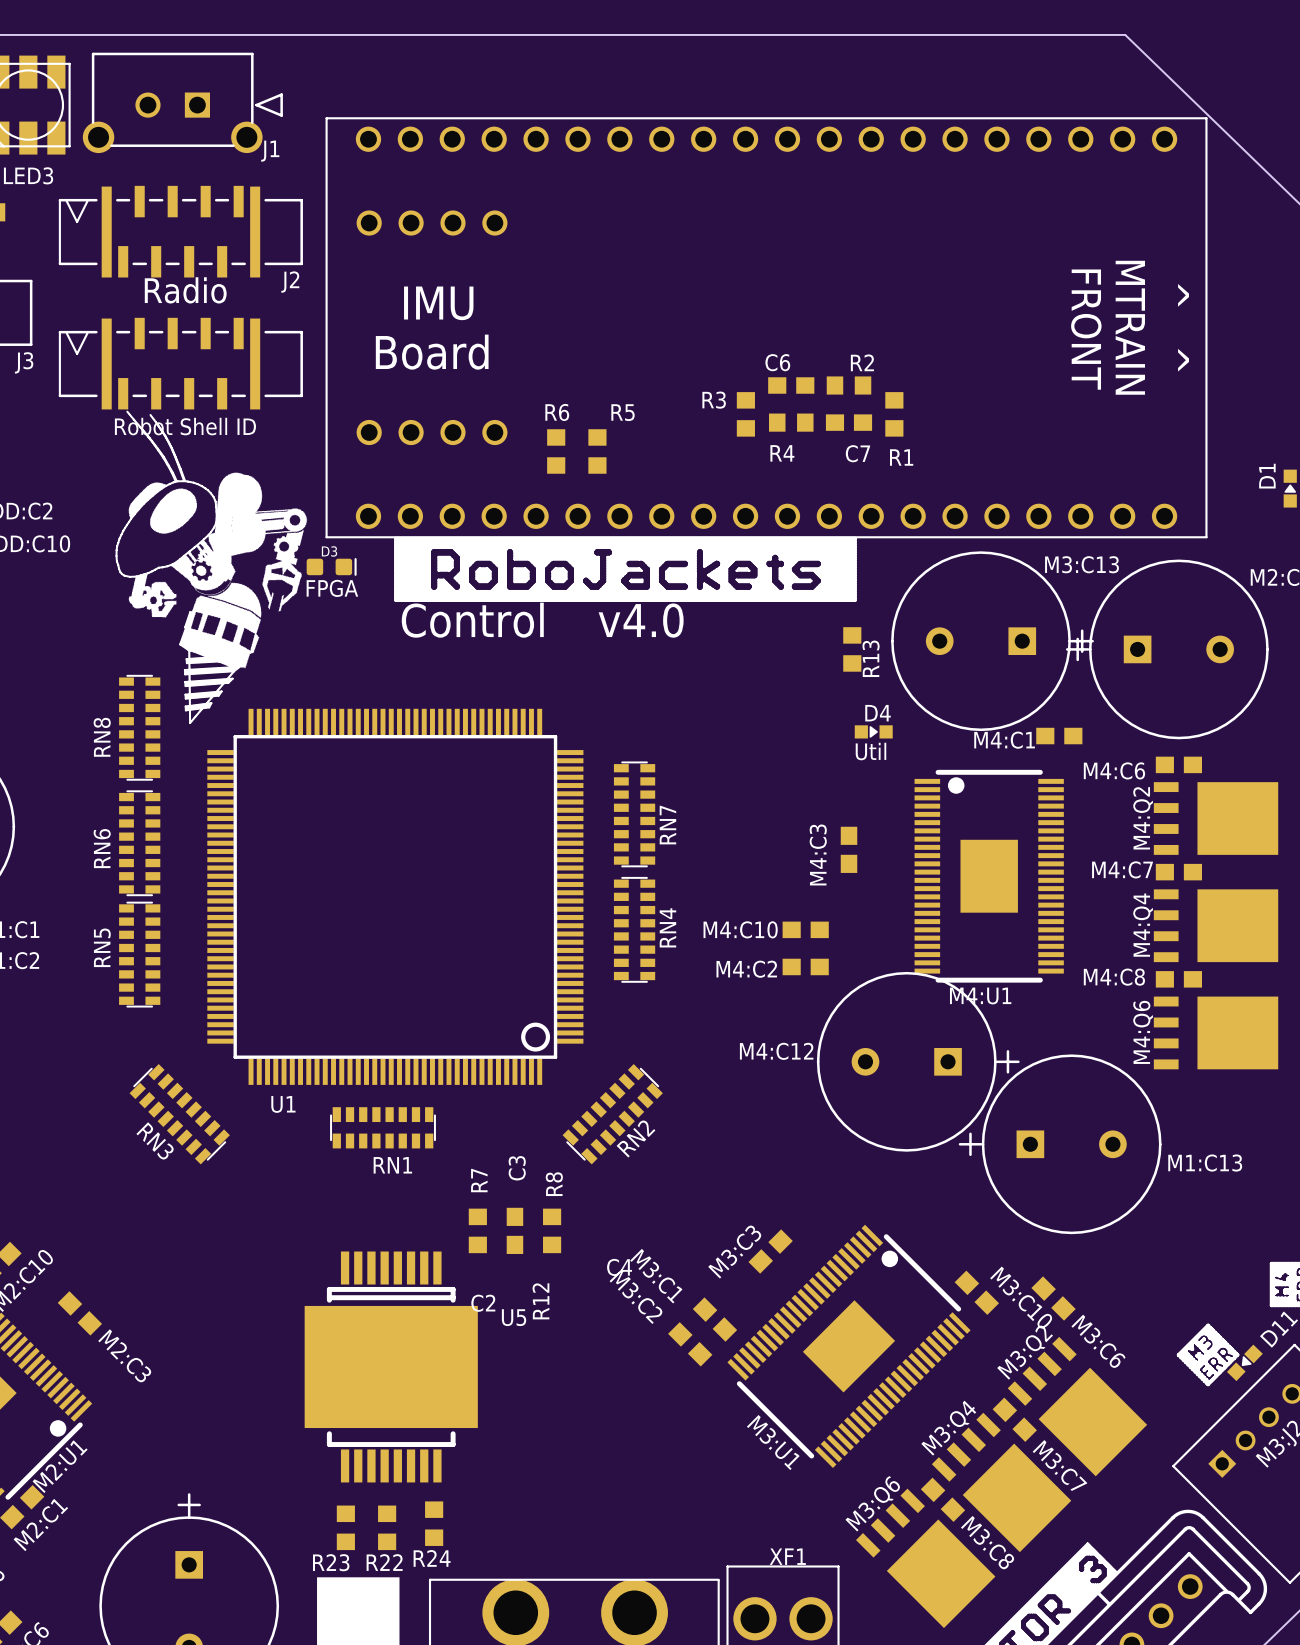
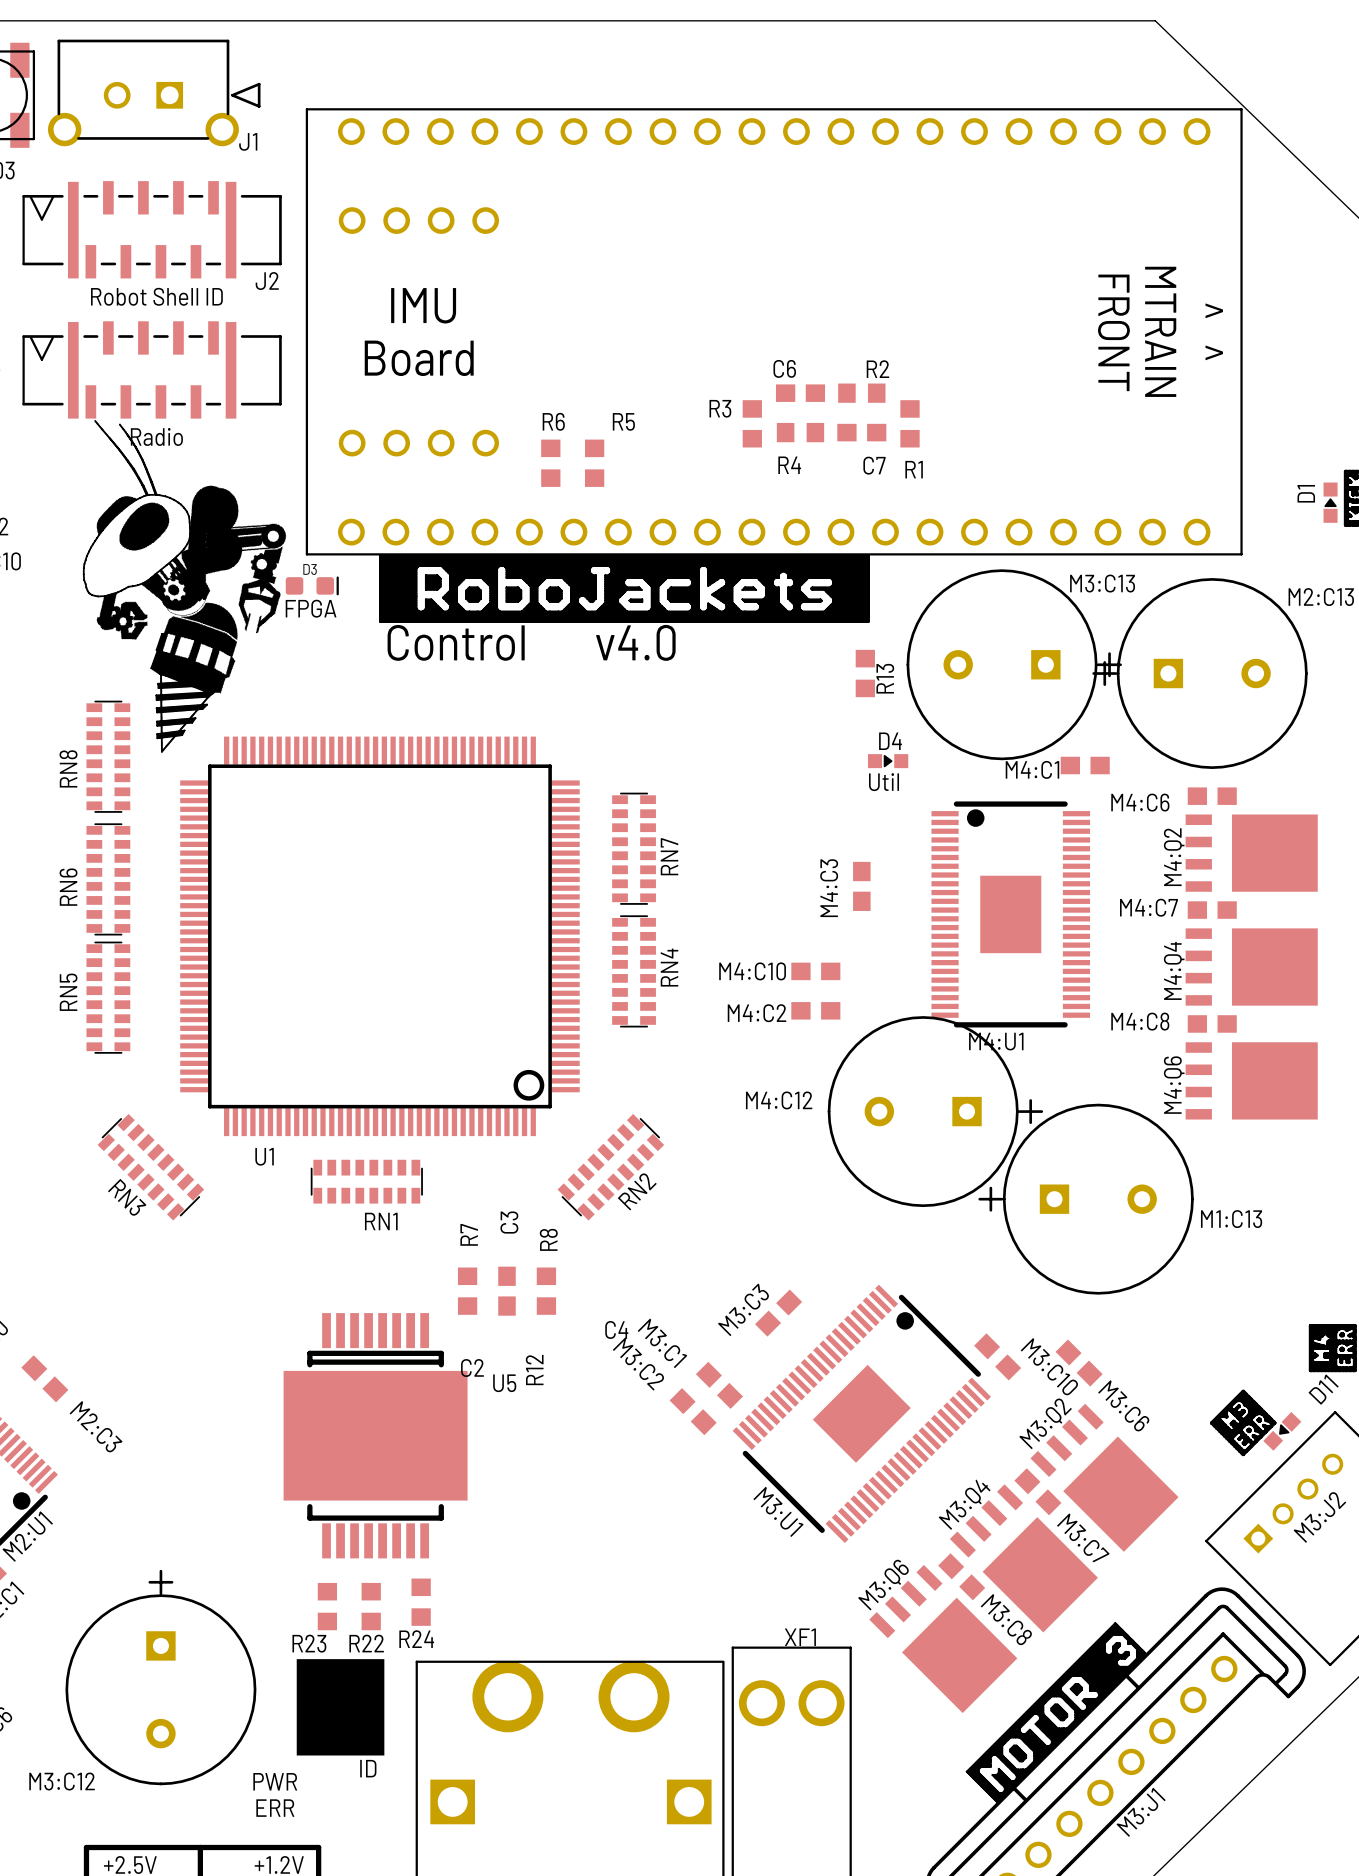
text: Radio (185, 290) -> Robot Shell ID (156, 296)
text: Robot Shell ID (185, 426) -> Radio (156, 436)

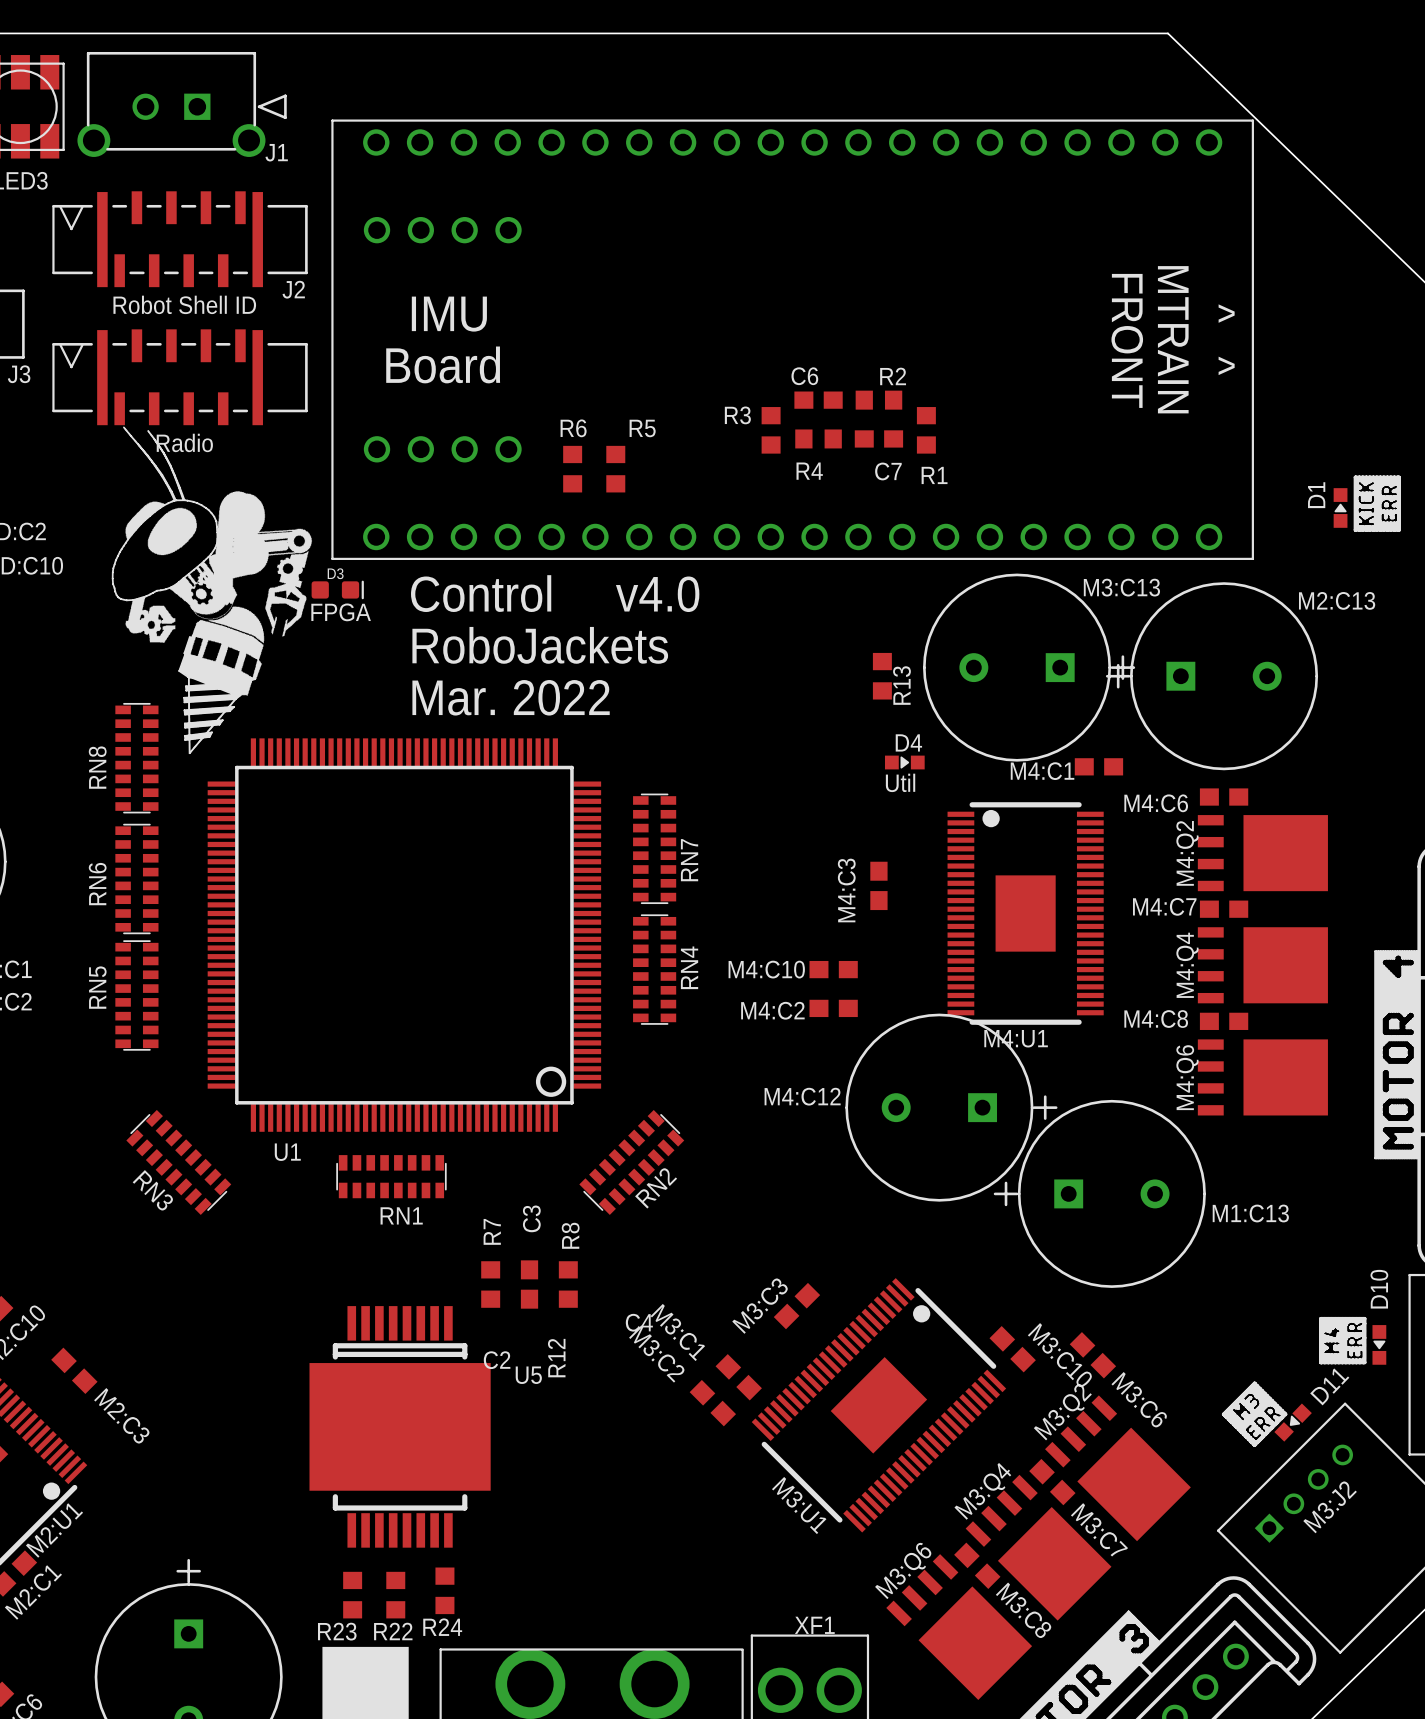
drawing: [379, 554, 870, 623] -> none
text: none -> Control (481, 593)
text: Control (456, 642) -> RoboJackets (540, 645)
text position: v4.0 (635, 642) -> v4.0 (657, 594)
text: none -> Mar. 2022 (511, 697)

